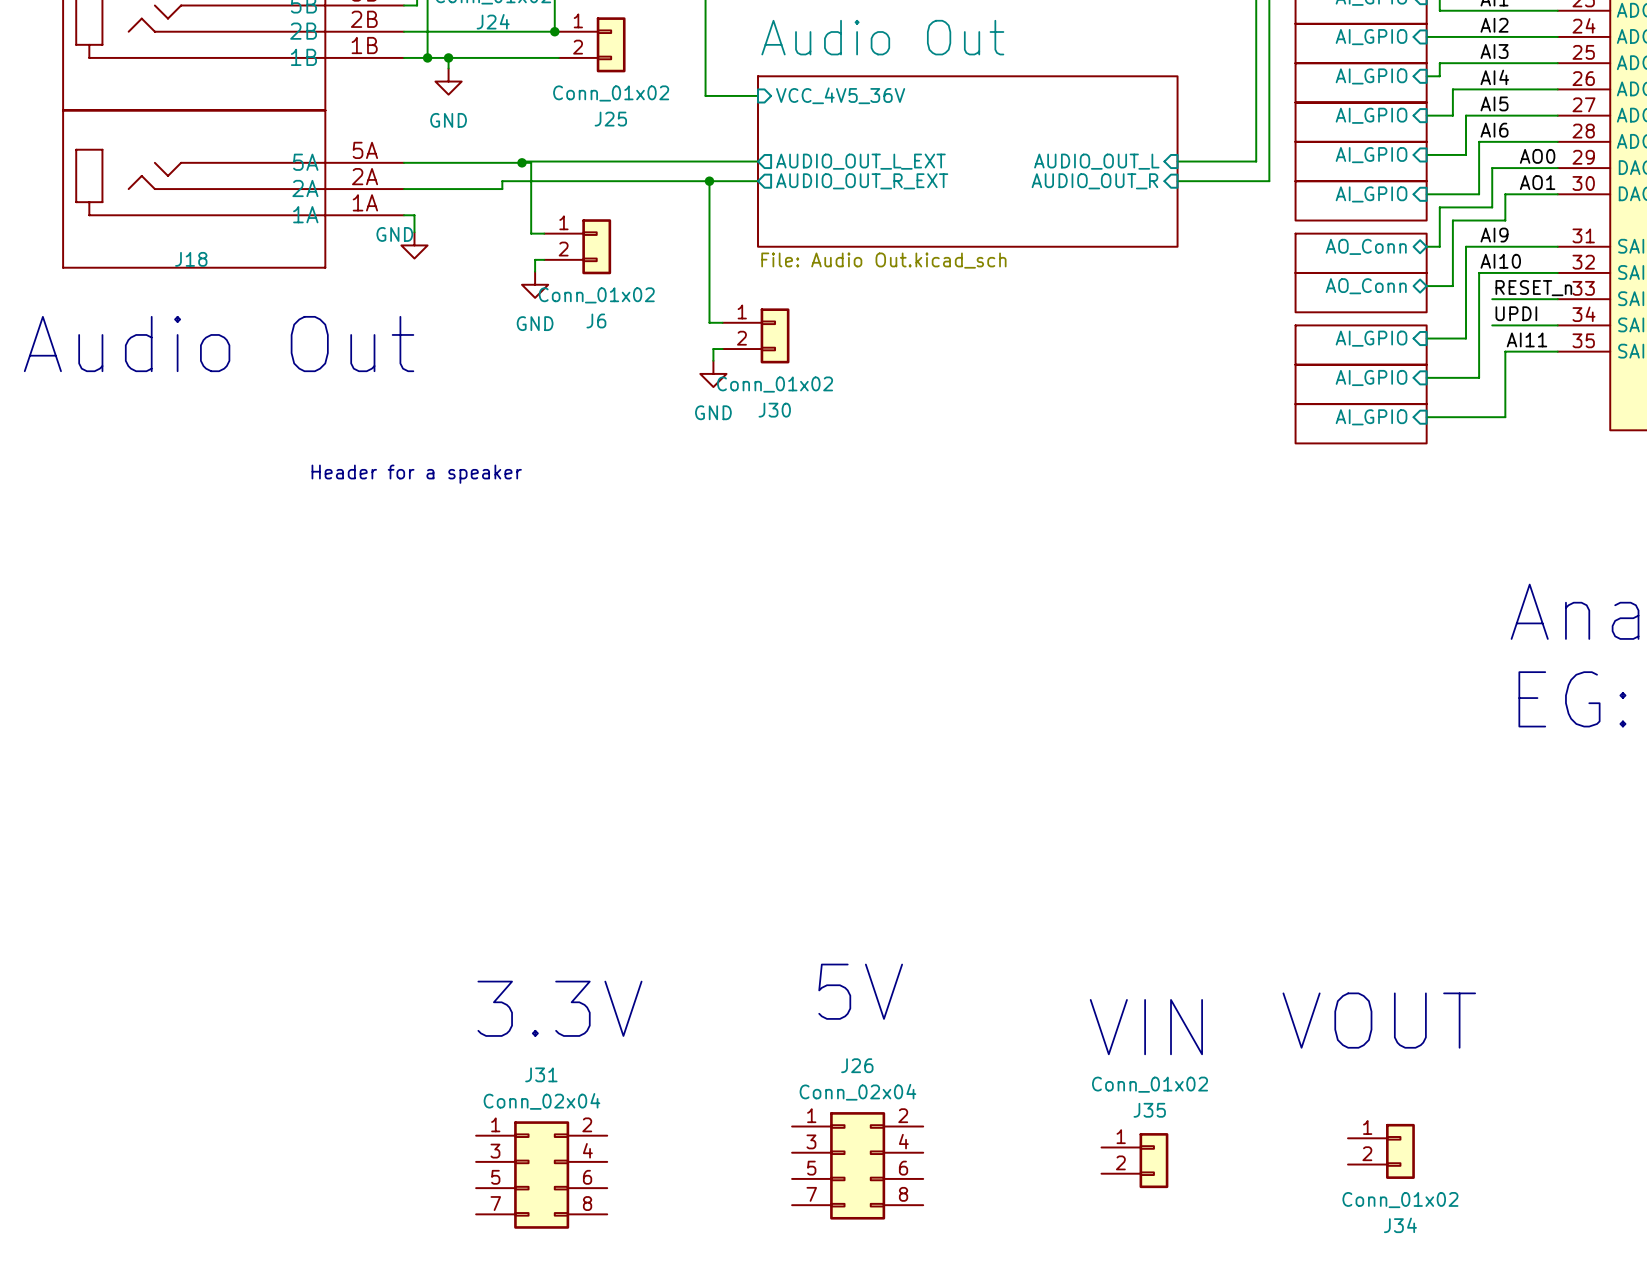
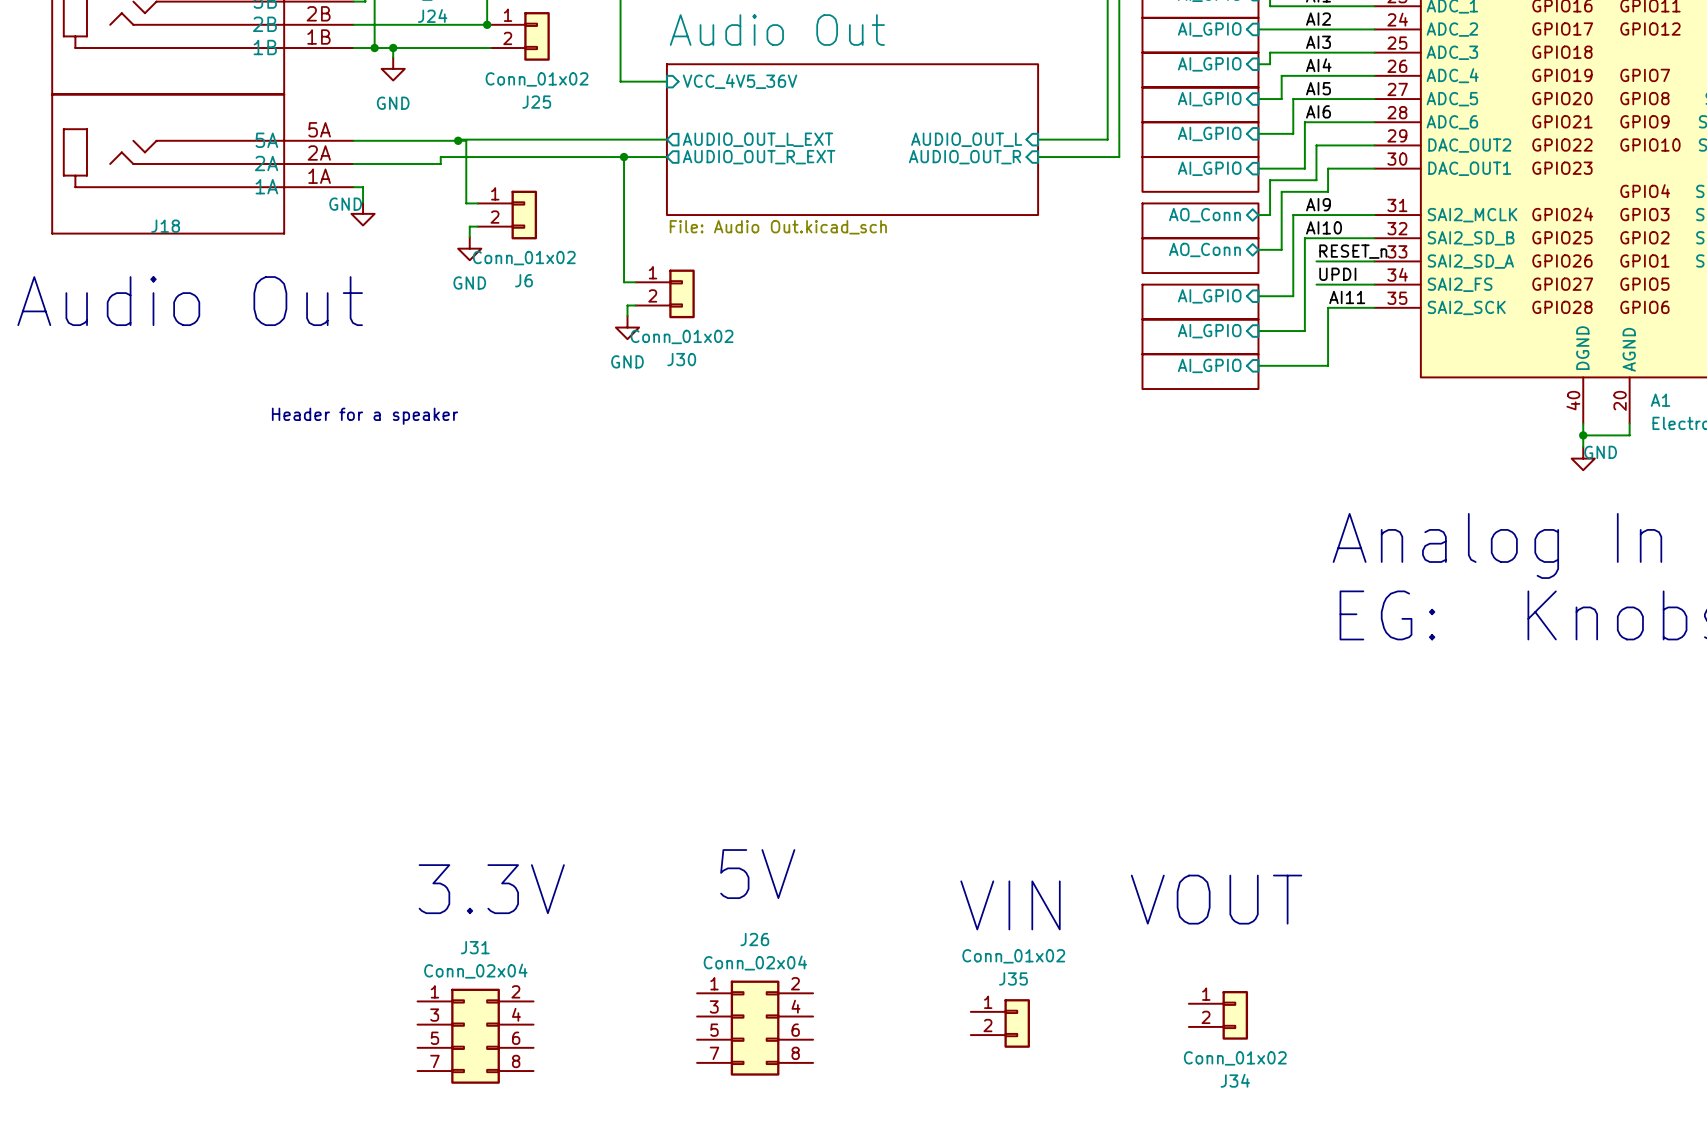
label: AO0 (1537, 156) -> none
label: AO1 (1537, 182) -> none

